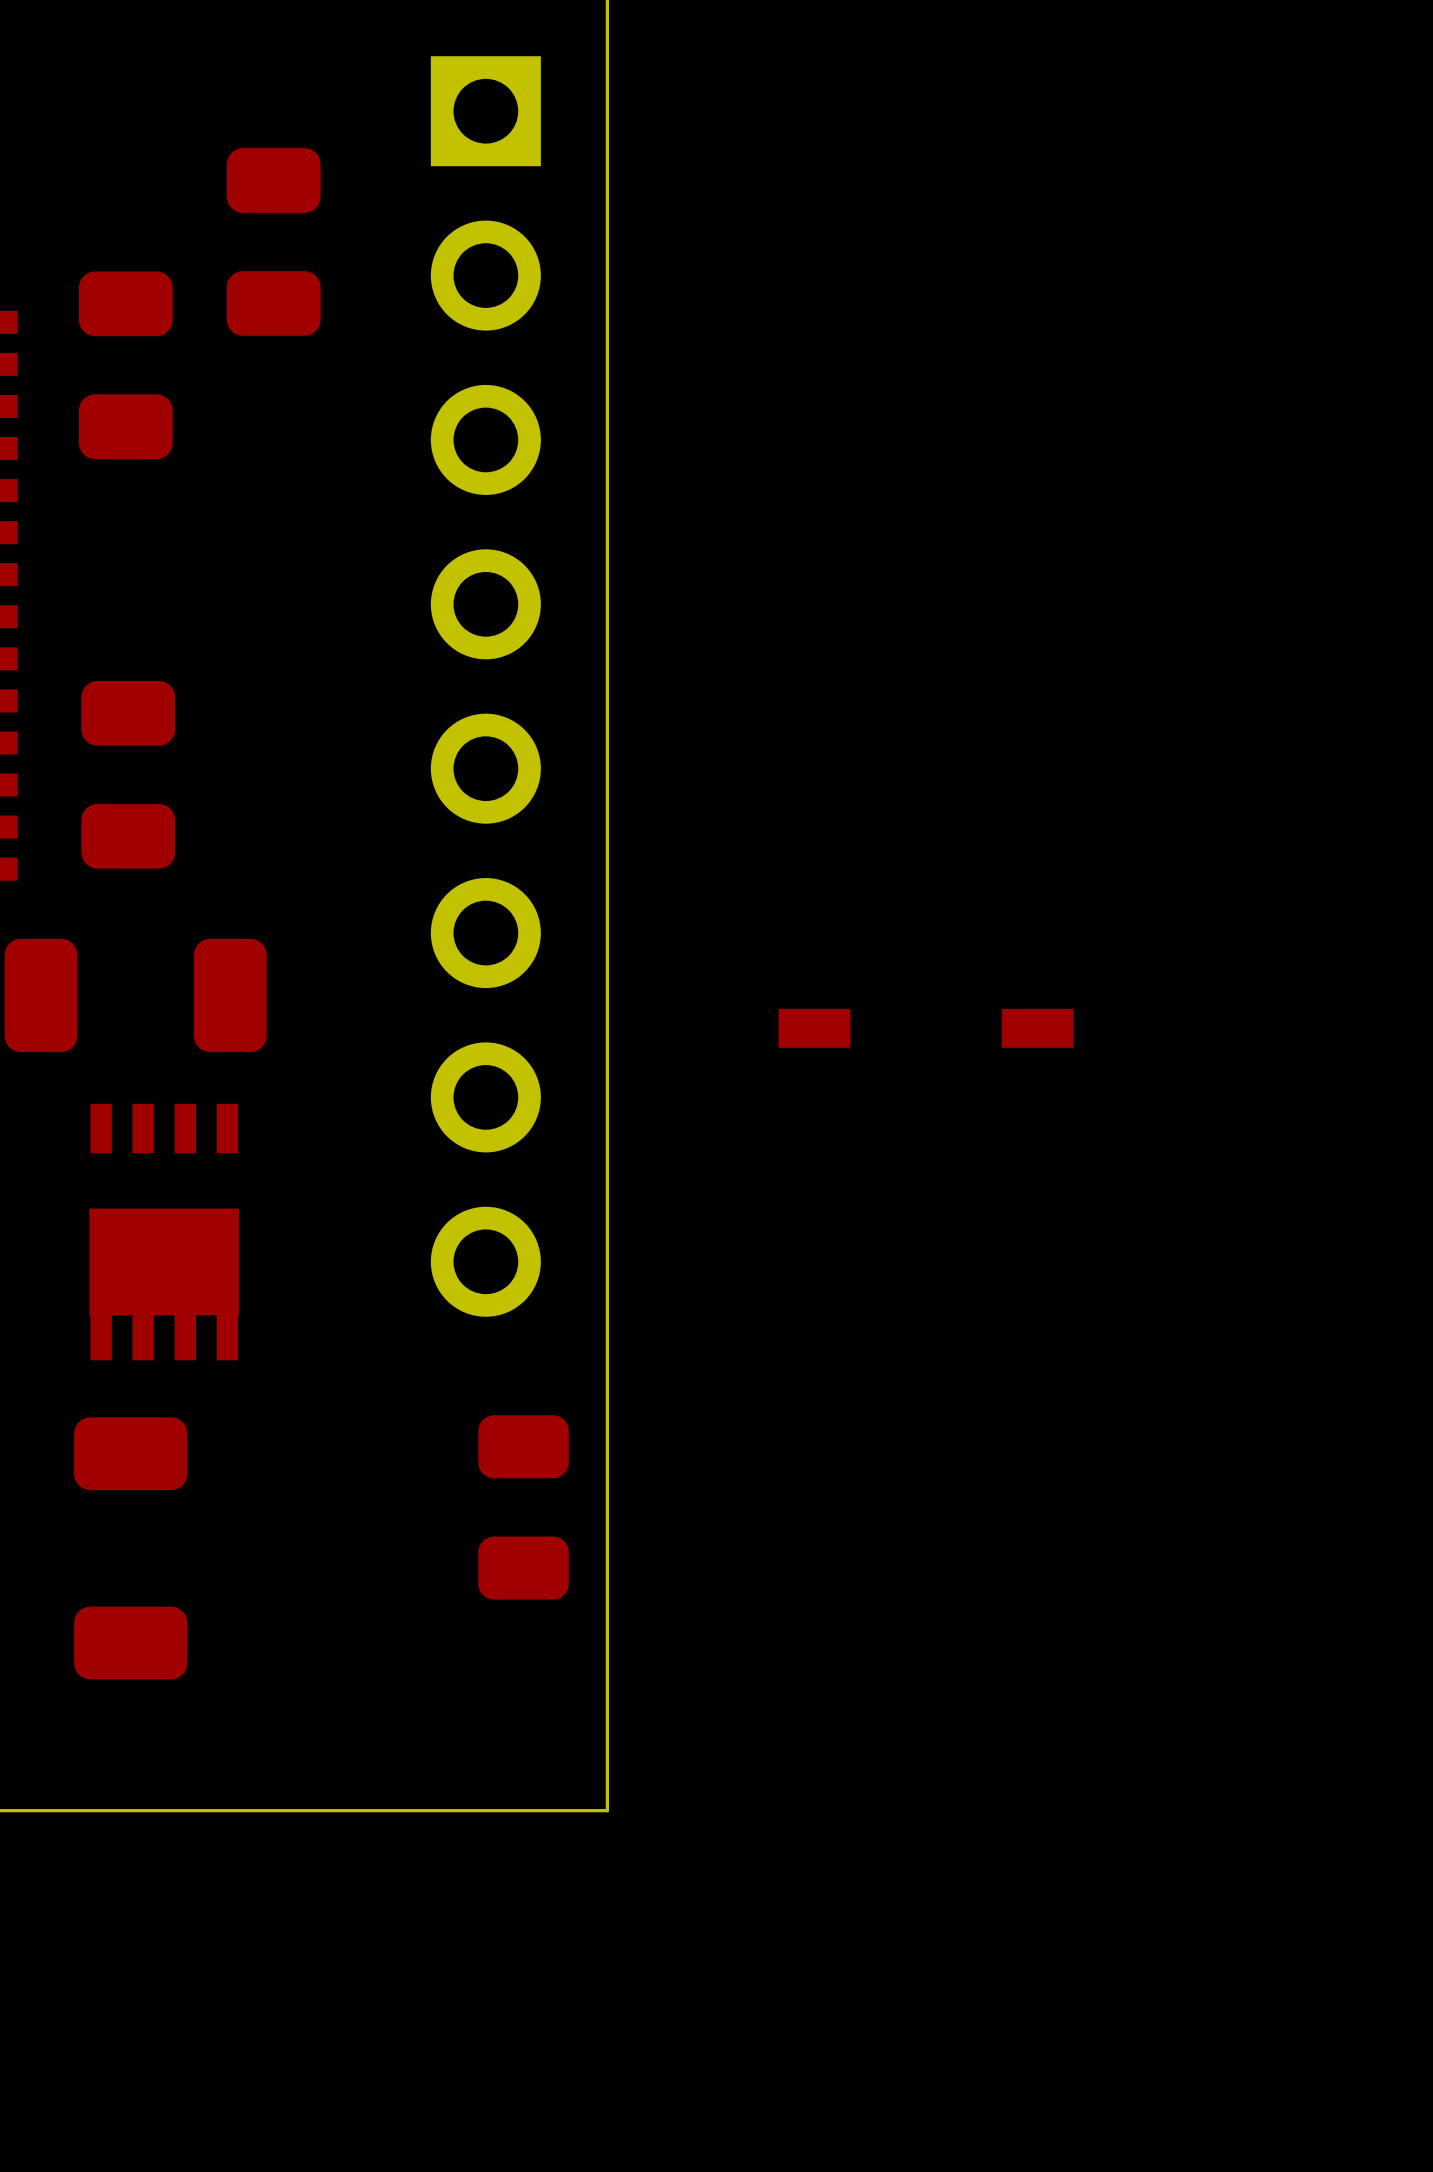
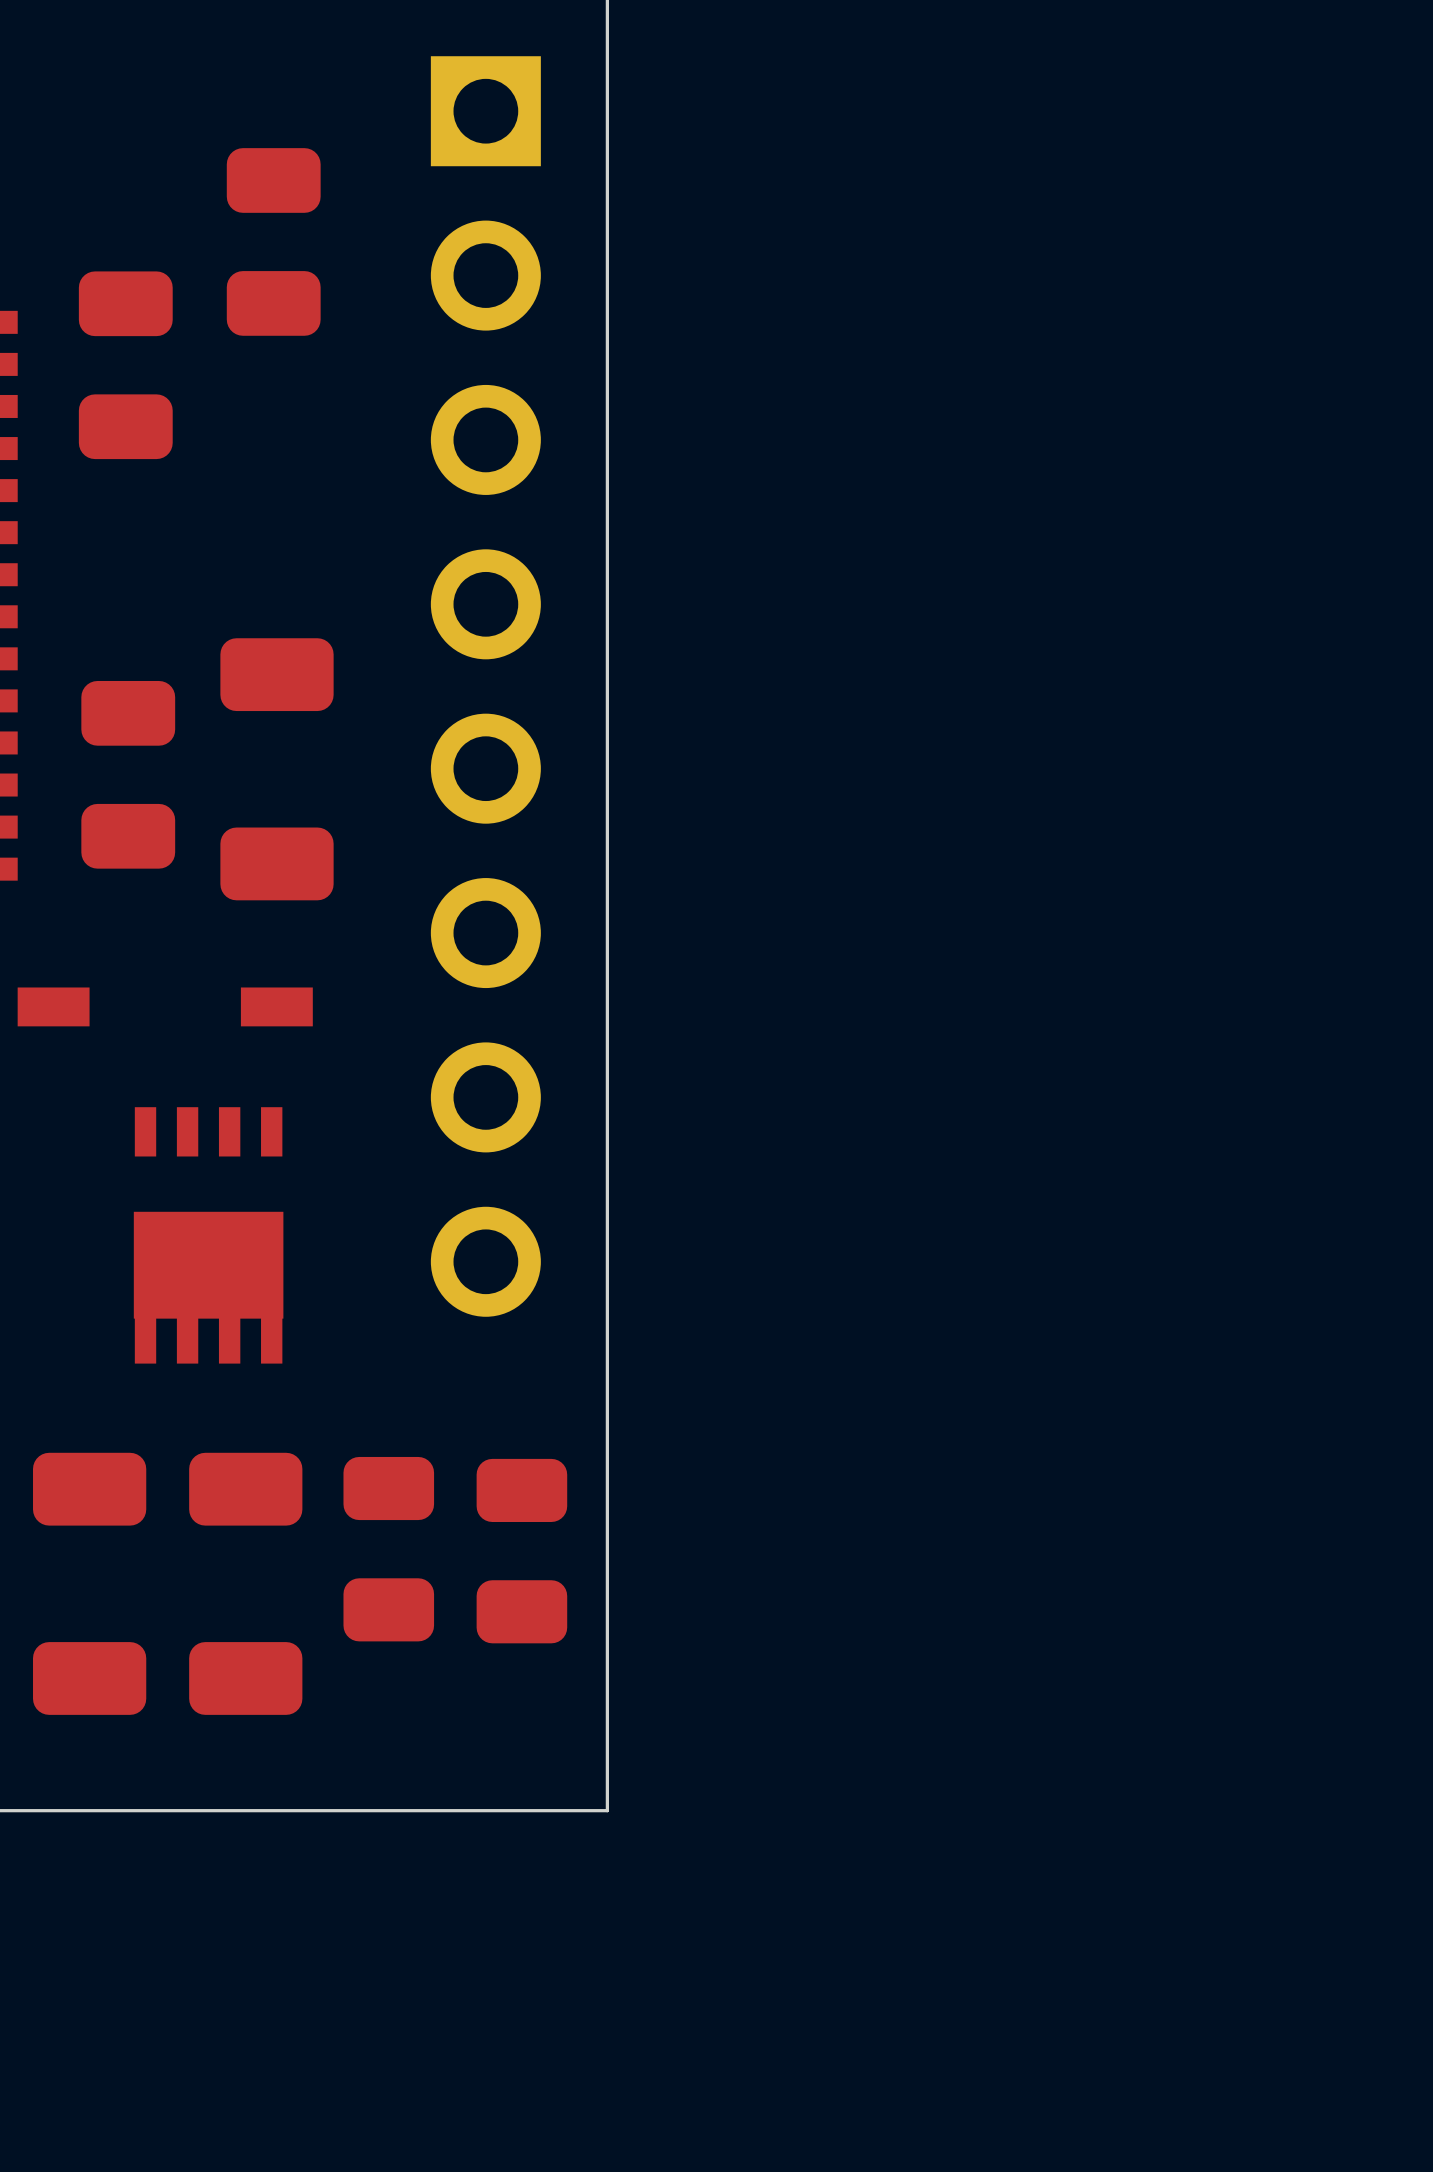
part: none -> (277, 769)
part footprint: [4, 938, 267, 1053] -> [17, 987, 313, 1027]
part: (926, 1028) -> none
part position: (164, 1232) -> (208, 1235)
part position: (523, 1507) -> (521, 1551)
part position: (130, 1548) -> (89, 1583)
part: none -> (388, 1549)
part: none -> (245, 1583)

